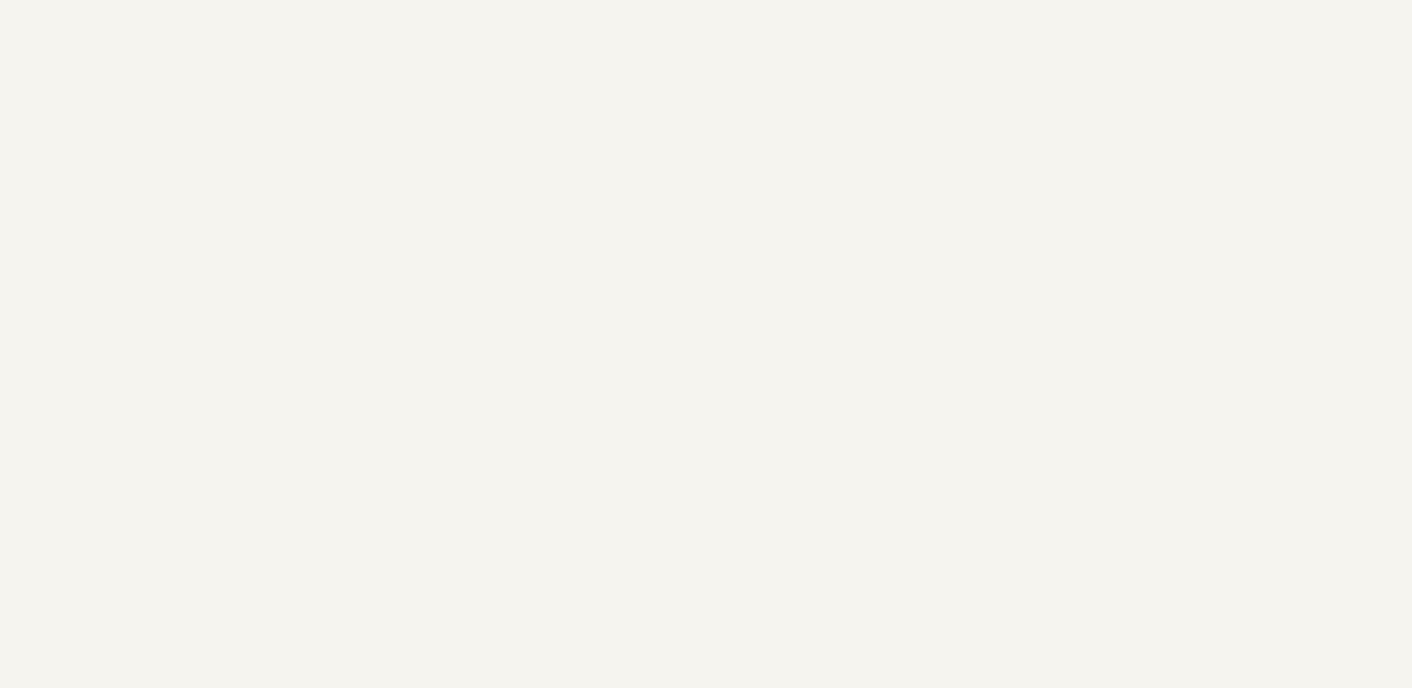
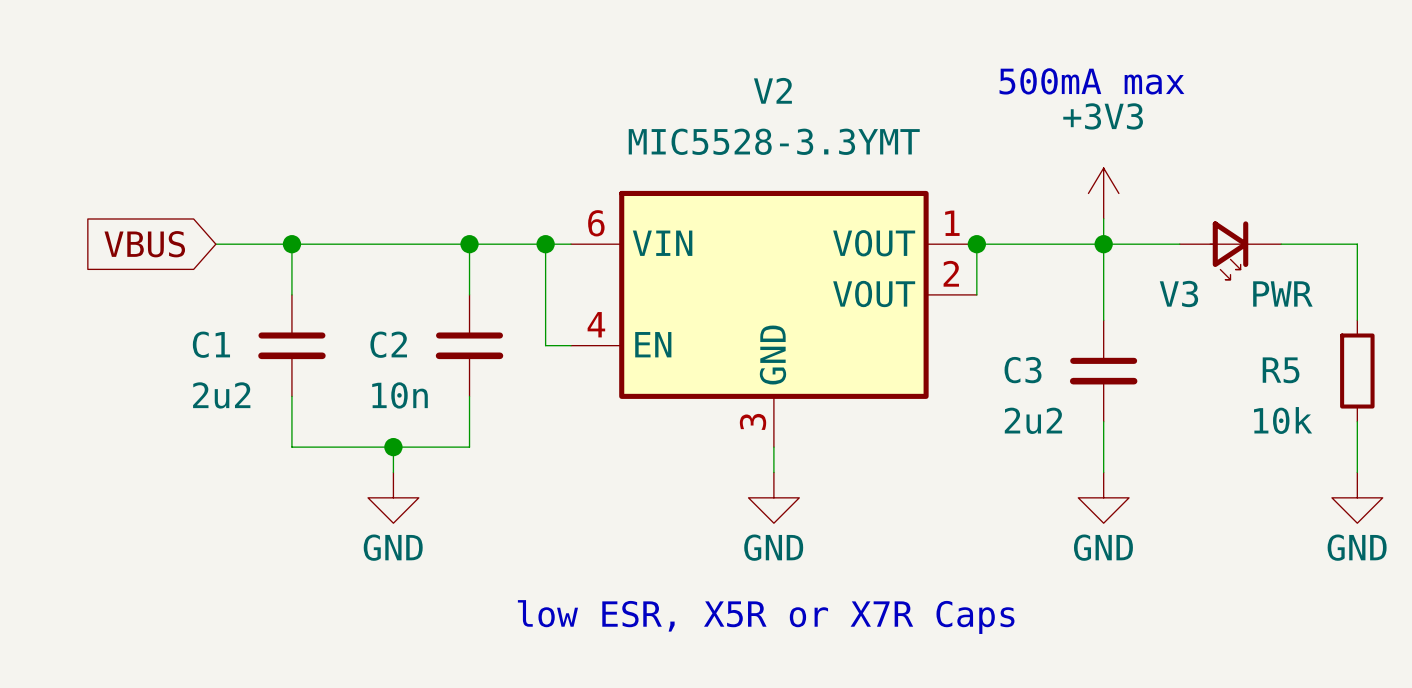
text: none -> 500mA max (1091, 81)
power symbol: none -> +3V3 (1103, 193)
wire: none -> (1103, 218) (1103, 320)
global label: none -> VBUS (144, 244)
wire: none -> (215, 244) (570, 244)
wire: none -> (291, 244) (291, 294)
junction: none -> (291, 244)
wire: none -> (469, 244) (469, 294)
junction: none -> (469, 244)
wire: none -> (545, 244) (545, 345) (570, 345)
junction: none -> (545, 244)
junction: none -> (976, 244)
junction: none -> (1103, 244)
wire: none -> (1179, 244) (976, 244) (976, 294)
wire: none -> (1281, 244) (1357, 244) (1357, 320)
V3: none -> PWR (1230, 250)
V2: none -> MIC5528-3.3YMT (773, 319)
C1: none -> 2u2 (291, 345)
C2: none -> 10n (469, 345)
C3: none -> 2u2 (1103, 371)
R5: none -> 10k (1357, 371)
wire: none -> (291, 396) (291, 447) (469, 447) (469, 396)
wire: none -> (1103, 421) (1103, 472)
wire: none -> (1357, 421) (1357, 472)
wire: none -> (393, 447) (393, 472)
junction: none -> (393, 447)
wire: none -> (773, 447) (773, 472)
power symbol: none -> GND (393, 497)
power symbol: none -> GND (773, 497)
power symbol: none -> GND (1103, 497)
power symbol: none -> GND (1357, 497)
text: none -> low ESR, X5R or X7R Caps (766, 617)

